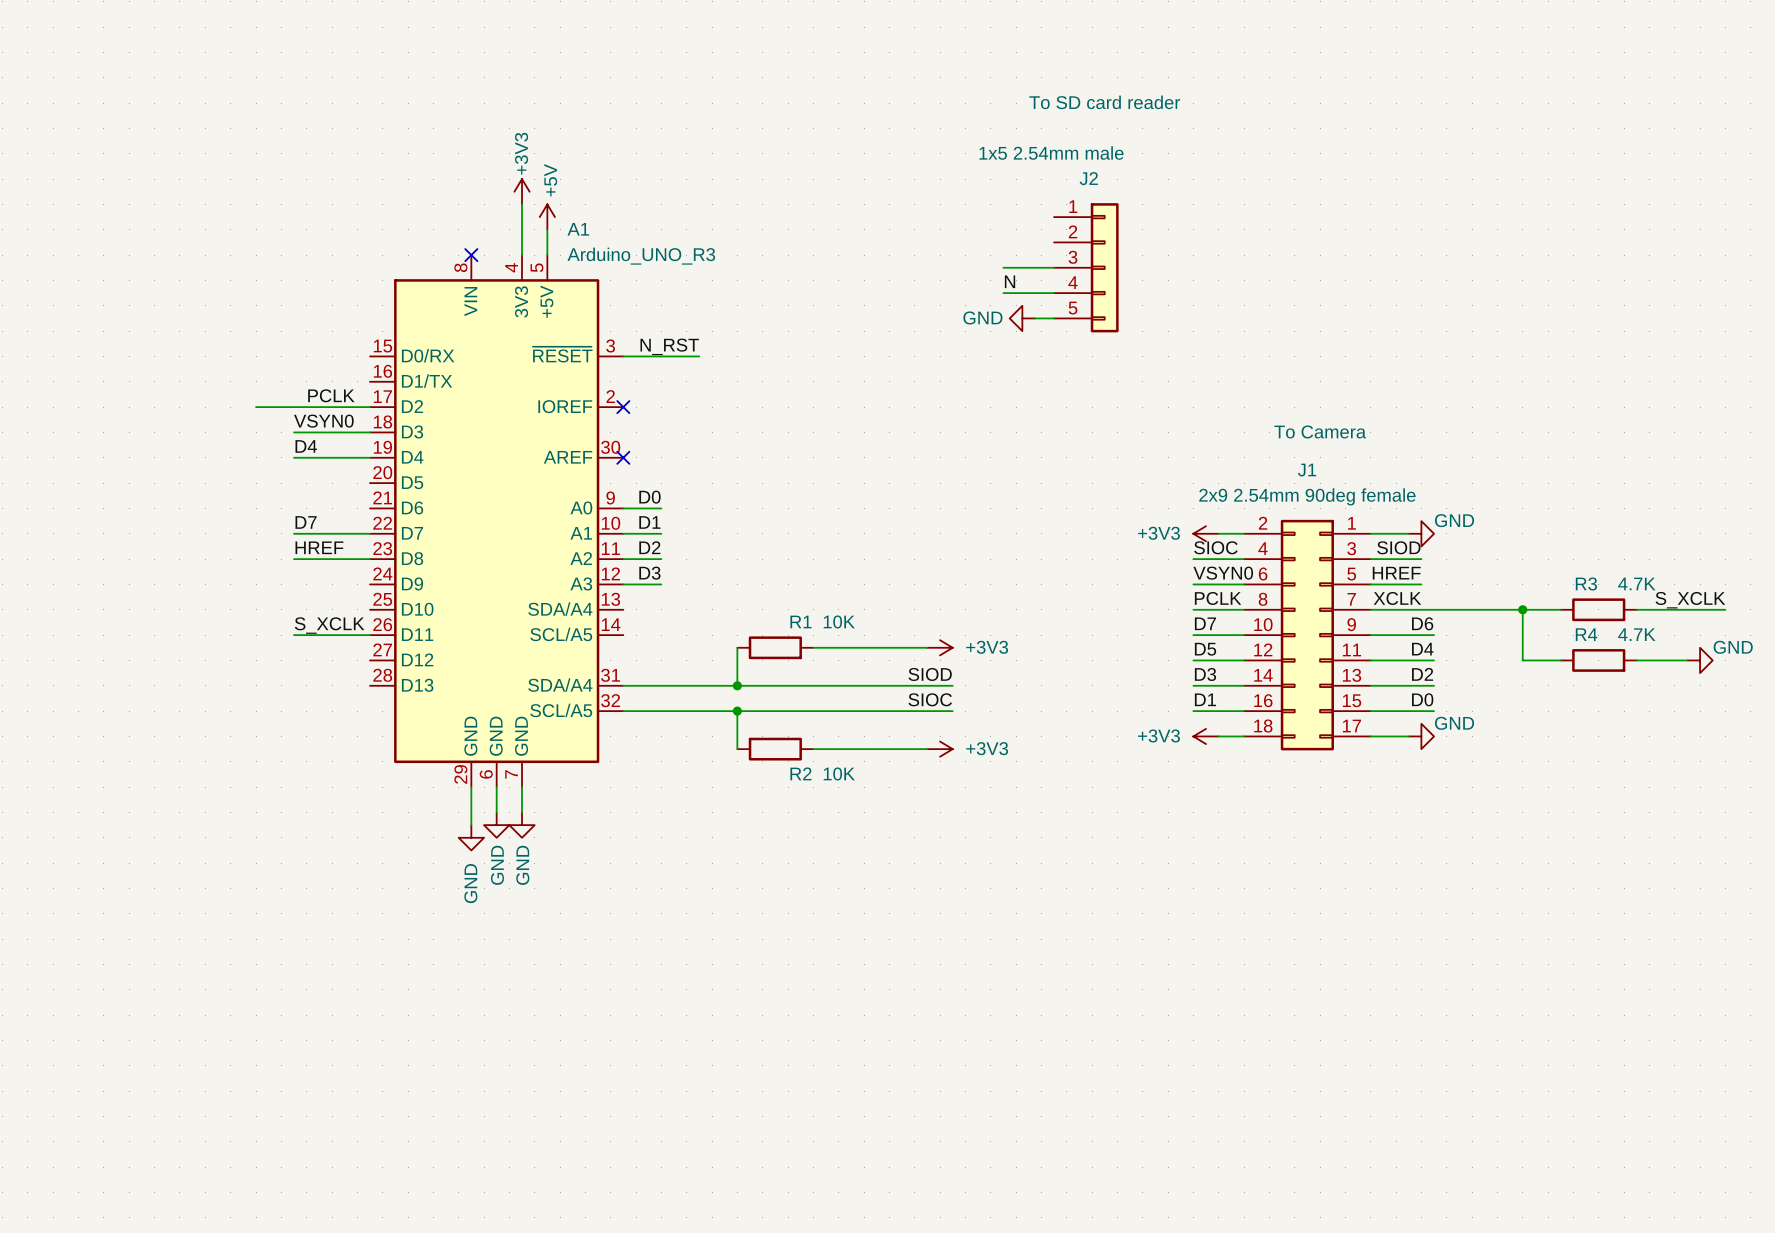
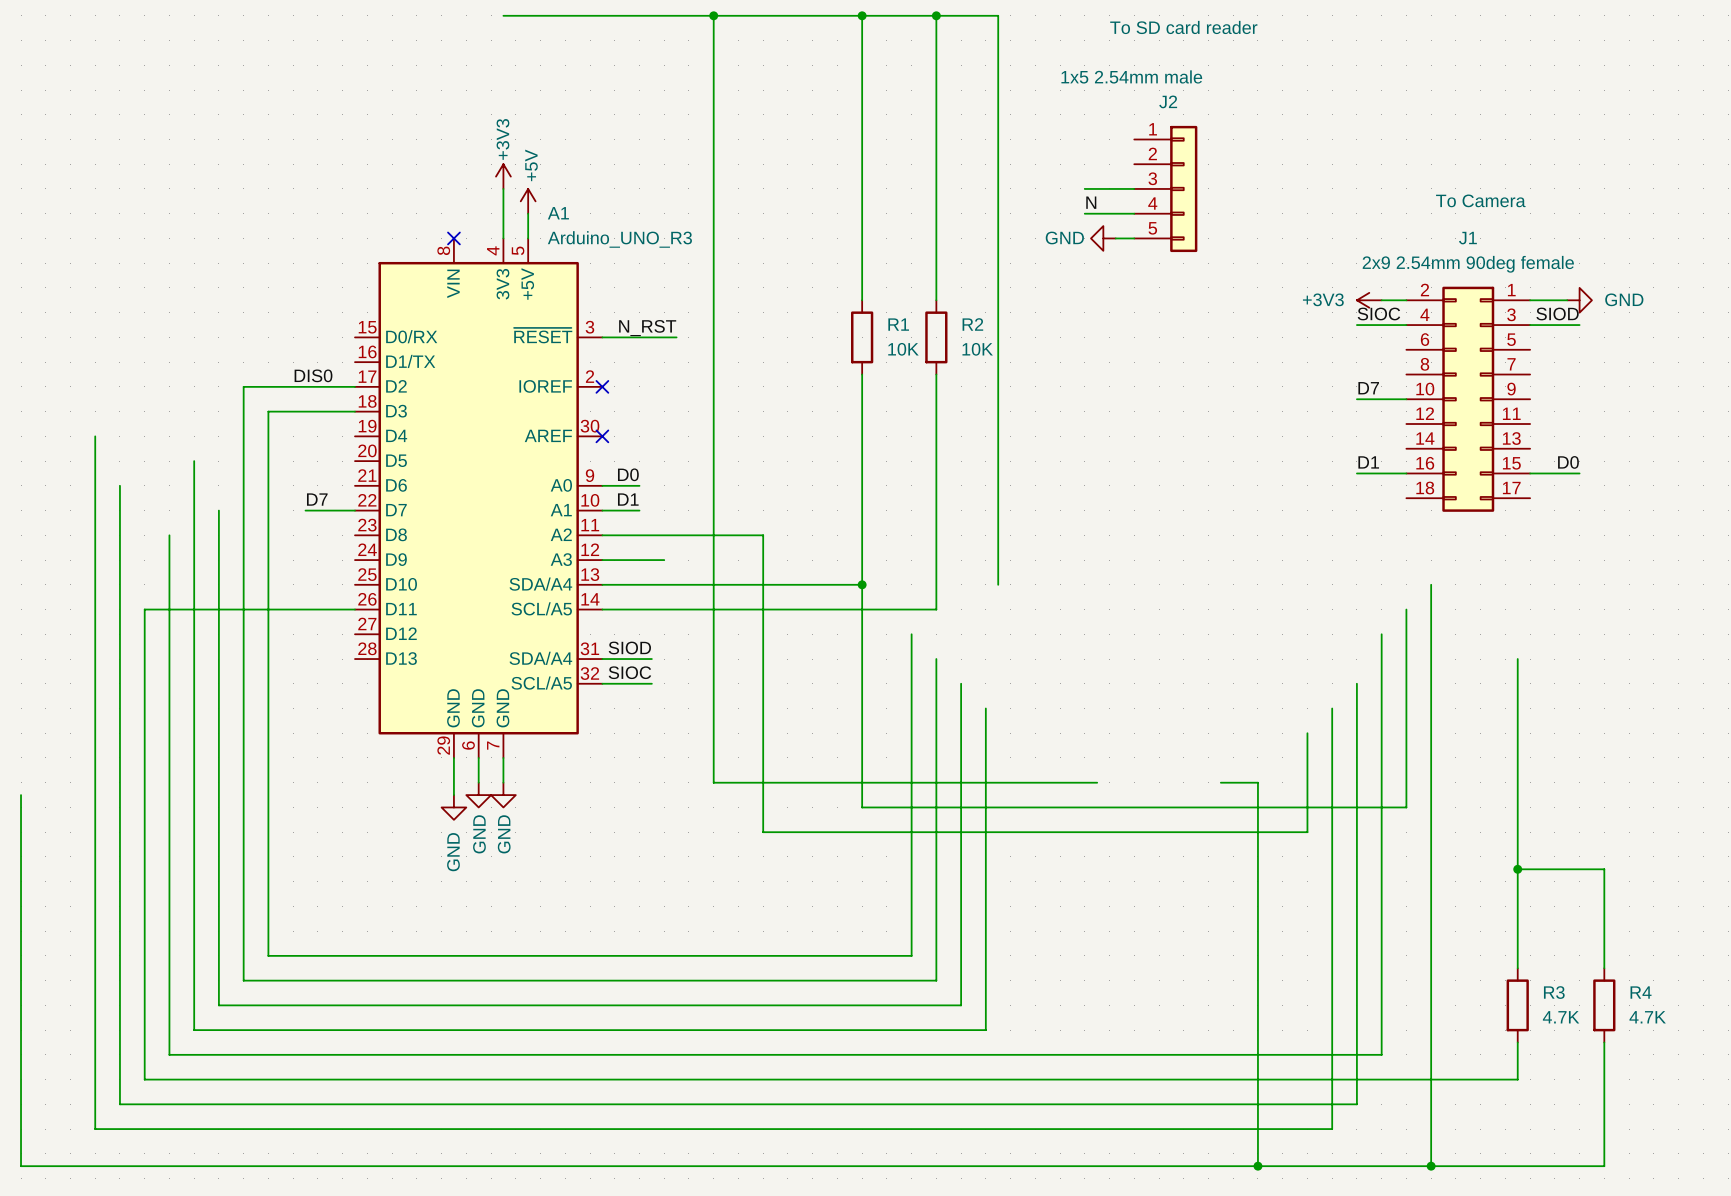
wire: none -> (503, 15) (998, 15) (998, 584)
wire: none -> (713, 15) (713, 621)
junction: none -> (713, 15)
wire: none -> (862, 15) (862, 300)
junction: none -> (862, 15)
wire: none -> (936, 15) (936, 300)
junction: none -> (936, 15)
wire: (1003, 267) (1054, 267) -> (1084, 188) (1134, 188)
J2 position: (1086, 267) -> (1165, 188)
label position: N (1010, 281) -> N (1091, 202)
wire: (1003, 293) (1054, 293) -> (1084, 213) (1134, 213)
power symbol position: GND (1022, 318) -> GND (1103, 238)
wire: (1035, 318) (1054, 318) -> (1115, 238) (1134, 238)
power symbol: none -> +3V3 (1369, 300)
wire: none -> (1381, 300) (1406, 300)
wire: none -> (1530, 300) (1567, 300)
power symbol: none -> GND (1579, 300)
label: none -> SIOC (1378, 314)
label: none -> SIOD (1557, 314)
wire: none -> (1356, 325) (1406, 325)
wire: none -> (1530, 325) (1579, 325)
wire: none -> (862, 374) (862, 807) (1406, 807) (1406, 609)
wire: none -> (936, 374) (936, 609) (602, 609)
label: PCLK (331, 395) -> DIS0 (313, 375)
wire: none -> (243, 386) (243, 980) (936, 980) (936, 659)
label: none -> D7 (1368, 388)
label: VSYN0 (323, 421) -> none
wire: none -> (280, 411) (268, 411) (268, 955) (911, 955) (911, 634)
label: D4 (306, 446) -> none
wire: (294, 457) (370, 457) -> none
wire: none -> (194, 461) (194, 1030) (985, 1030) (985, 708)
label: none -> D1 (1368, 462)
label: none -> D0 (1568, 462)
wire: none -> (119, 485) (119, 1104) (1356, 1104) (1356, 683)
label position: D7 (306, 522) -> D7 (317, 499)
wire: none -> (218, 510) (218, 1005) (961, 1005) (961, 683)
wire: (294, 533) (319, 533) -> none
power symbol: +3V3 (1206, 533) -> none
wire: (1218, 533) (1244, 533) -> none
wire: (1370, 533) (1408, 533) -> none
power symbol: GND (1421, 533) -> none
label: HREF (319, 547) -> none
label: D2 (649, 547) -> none
label: SIOC (1215, 547) -> none
label: SIOD (1398, 547) -> none
wire: none -> (169, 535) (169, 1054) (1381, 1054) (1381, 634)
wire: (294, 559) (370, 559) -> none
wire: none -> (639, 535) (763, 535) (763, 832) (1307, 832) (1307, 733)
wire: (1193, 559) (1244, 559) -> (1356, 473) (1406, 473)
wire: (1370, 559) (1421, 559) -> (1530, 473) (1579, 473)
label: D3 (649, 573) -> none
label: VSYN0 (1223, 573) -> none
label: HREF (1396, 573) -> none
R3 value position: 4.7K (1636, 583) -> 4.7K (1561, 1017)
wire: none -> (639, 560) (664, 560)
wire: (1193, 584) (1244, 584) -> none
wire: (1370, 584) (1421, 584) -> (1356, 399) (1406, 399)
label: PCLK (1218, 598) -> none
label: XCLK (1397, 598) -> none
label: S_XCLK (1690, 600) -> none
wire: none -> (602, 584) (862, 584)
junction: none -> (862, 584)
wire: (1193, 609) (1244, 609) -> none
wire: (1370, 609) (1560, 609) -> none
wire: none -> (1431, 584) (1431, 1166)
wire: (1522, 609) (1522, 660) (1560, 660) -> none
junction: (1522, 609) -> none
R3 rotation: 0° (1598, 609) -> 90° clockwise (1517, 1005)
R3 position: (1598, 609) -> (1517, 1005)
wire: (1636, 609) (1725, 609) -> none
R1 name position: R1 (801, 621) -> R1 (898, 324)
R1 value position: 10K (839, 621) -> 10K (903, 349)
label: D7 (1205, 623) -> none
label: D6 (1422, 623) -> none
label: S_XCLK (329, 625) -> none
R4 value position: 4.7K (1636, 634) -> 4.7K (1647, 1017)
wire: none -> (280, 609) (144, 609) (144, 1079) (1517, 1079) (1517, 1042)
wire: (1193, 635) (1244, 635) -> none
J1 position: (1307, 635) -> (1468, 399)
wire: (1370, 635) (1434, 635) -> none
R1 rotation: 0° (775, 647) -> 90° clockwise (862, 337)
R1 position: (775, 647) -> (862, 337)
wire: (813, 647) (927, 647) -> none
power symbol: +3V3 (940, 647) -> none
label: D5 (1205, 649) -> none
label: D4 (1422, 649) -> none
wire: (1193, 660) (1244, 660) -> none
wire: (1370, 660) (1434, 660) -> none
R4 rotation: 0° (1598, 660) -> 90° clockwise (1604, 1005)
R4 position: (1598, 660) -> (1604, 1005)
wire: (1636, 660) (1687, 660) -> none
power symbol: GND (1700, 660) -> none
label: none -> SIOD (629, 647)
label: SIOD (930, 674) -> none
label: D3 (1205, 674) -> none
label: D2 (1422, 674) -> none
wire: (674, 685) (952, 685) -> none
wire: none -> (713, 659) (713, 683)
junction: (737, 685) -> none
wire: (1193, 685) (1244, 685) -> none
wire: (1370, 685) (1434, 685) -> none
wire: none -> (1517, 659) (1517, 968)
label: none -> SIOC (629, 672)
label: SIOC (930, 699) -> none
label: D1 (1205, 699) -> none
label: D0 (1422, 699) -> none
wire: (674, 711) (952, 711) -> none
junction: (737, 711) -> none
wire: (1193, 711) (1244, 711) -> none
wire: (1370, 711) (1434, 711) -> none
power symbol: +3V3 (1206, 736) -> none
wire: (1218, 736) (1244, 736) -> none
wire: (1370, 736) (1408, 736) -> (1332, 708) (1332, 1129) (95, 1129) (95, 436)
power symbol: GND (1421, 736) -> none
wire: none -> (713, 720) (713, 782) (1097, 782)
R2 rotation: 0° (775, 749) -> 90° clockwise (936, 337)
R2 position: (775, 749) -> (936, 337)
wire: (813, 749) (927, 749) -> none
power symbol: +3V3 (940, 749) -> none
R2 name position: R2 (800, 773) -> R2 (972, 324)
R2 value position: 10K (839, 773) -> 10K (977, 349)
wire: none -> (1220, 782) (1257, 782) (1257, 1166)
wire: none -> (21, 795) (21, 1166) (1604, 1166) (1604, 1042)
wire: none -> (1517, 869) (1604, 869) (1604, 968)
junction: none -> (1517, 869)
junction: none -> (1257, 1166)
junction: none -> (1431, 1166)

